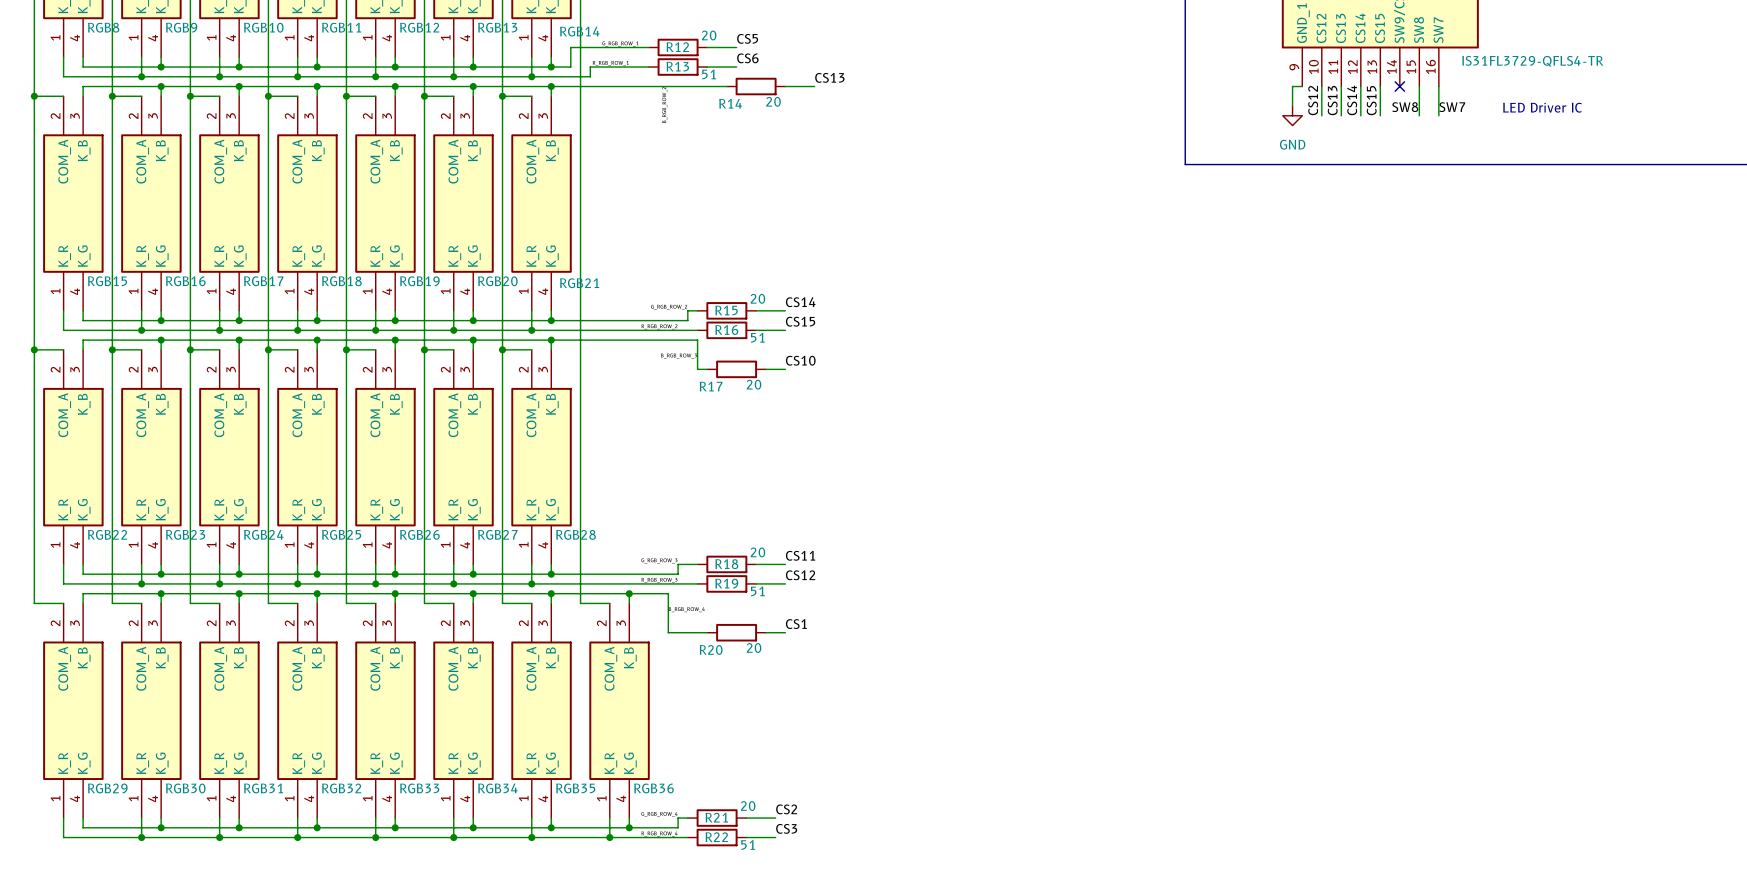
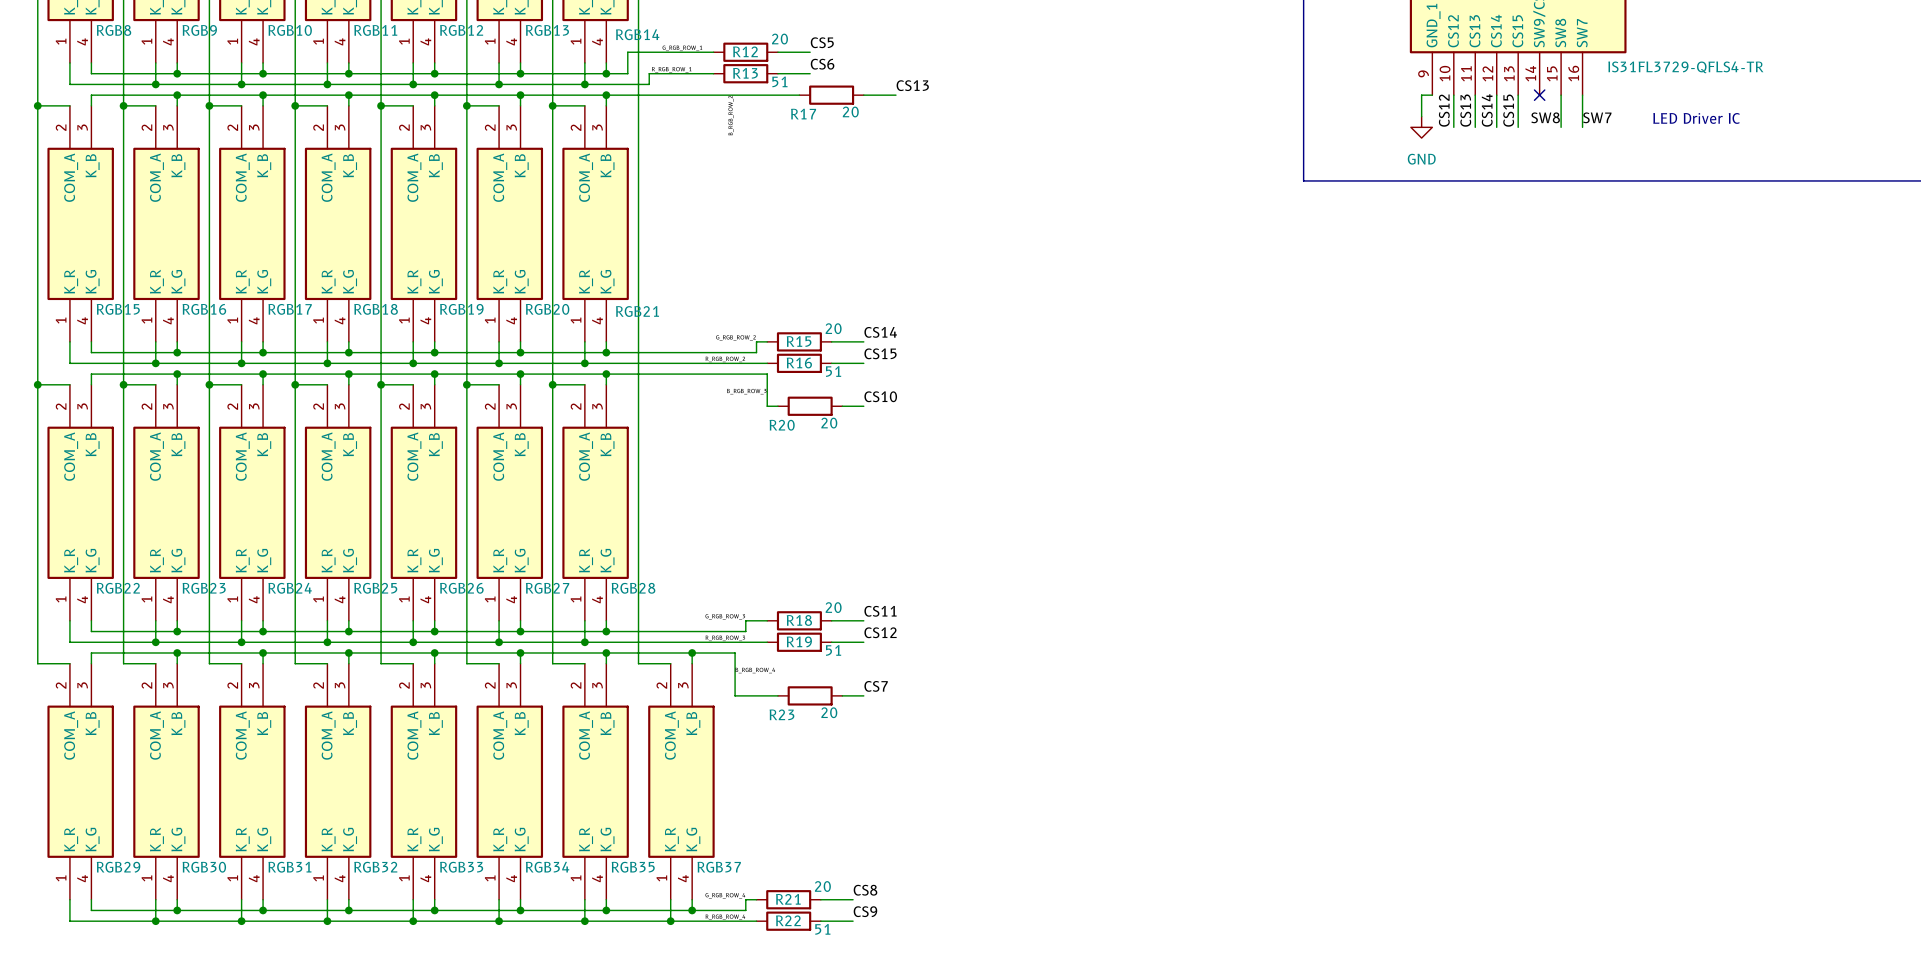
R14 name: R14 (730, 103) -> R17 (803, 114)
R17 name: R17 (711, 386) -> R20 (782, 425)
label: CS1 (796, 624) -> CS7 (876, 686)
R20 name: R20 (711, 649) -> R23 (781, 714)
RGB36 name: RGB36 (654, 788) -> RGB37 (719, 867)
label: CS2 (786, 809) -> CS8 (865, 890)
label: CS3 (786, 828) -> CS9 (865, 911)

